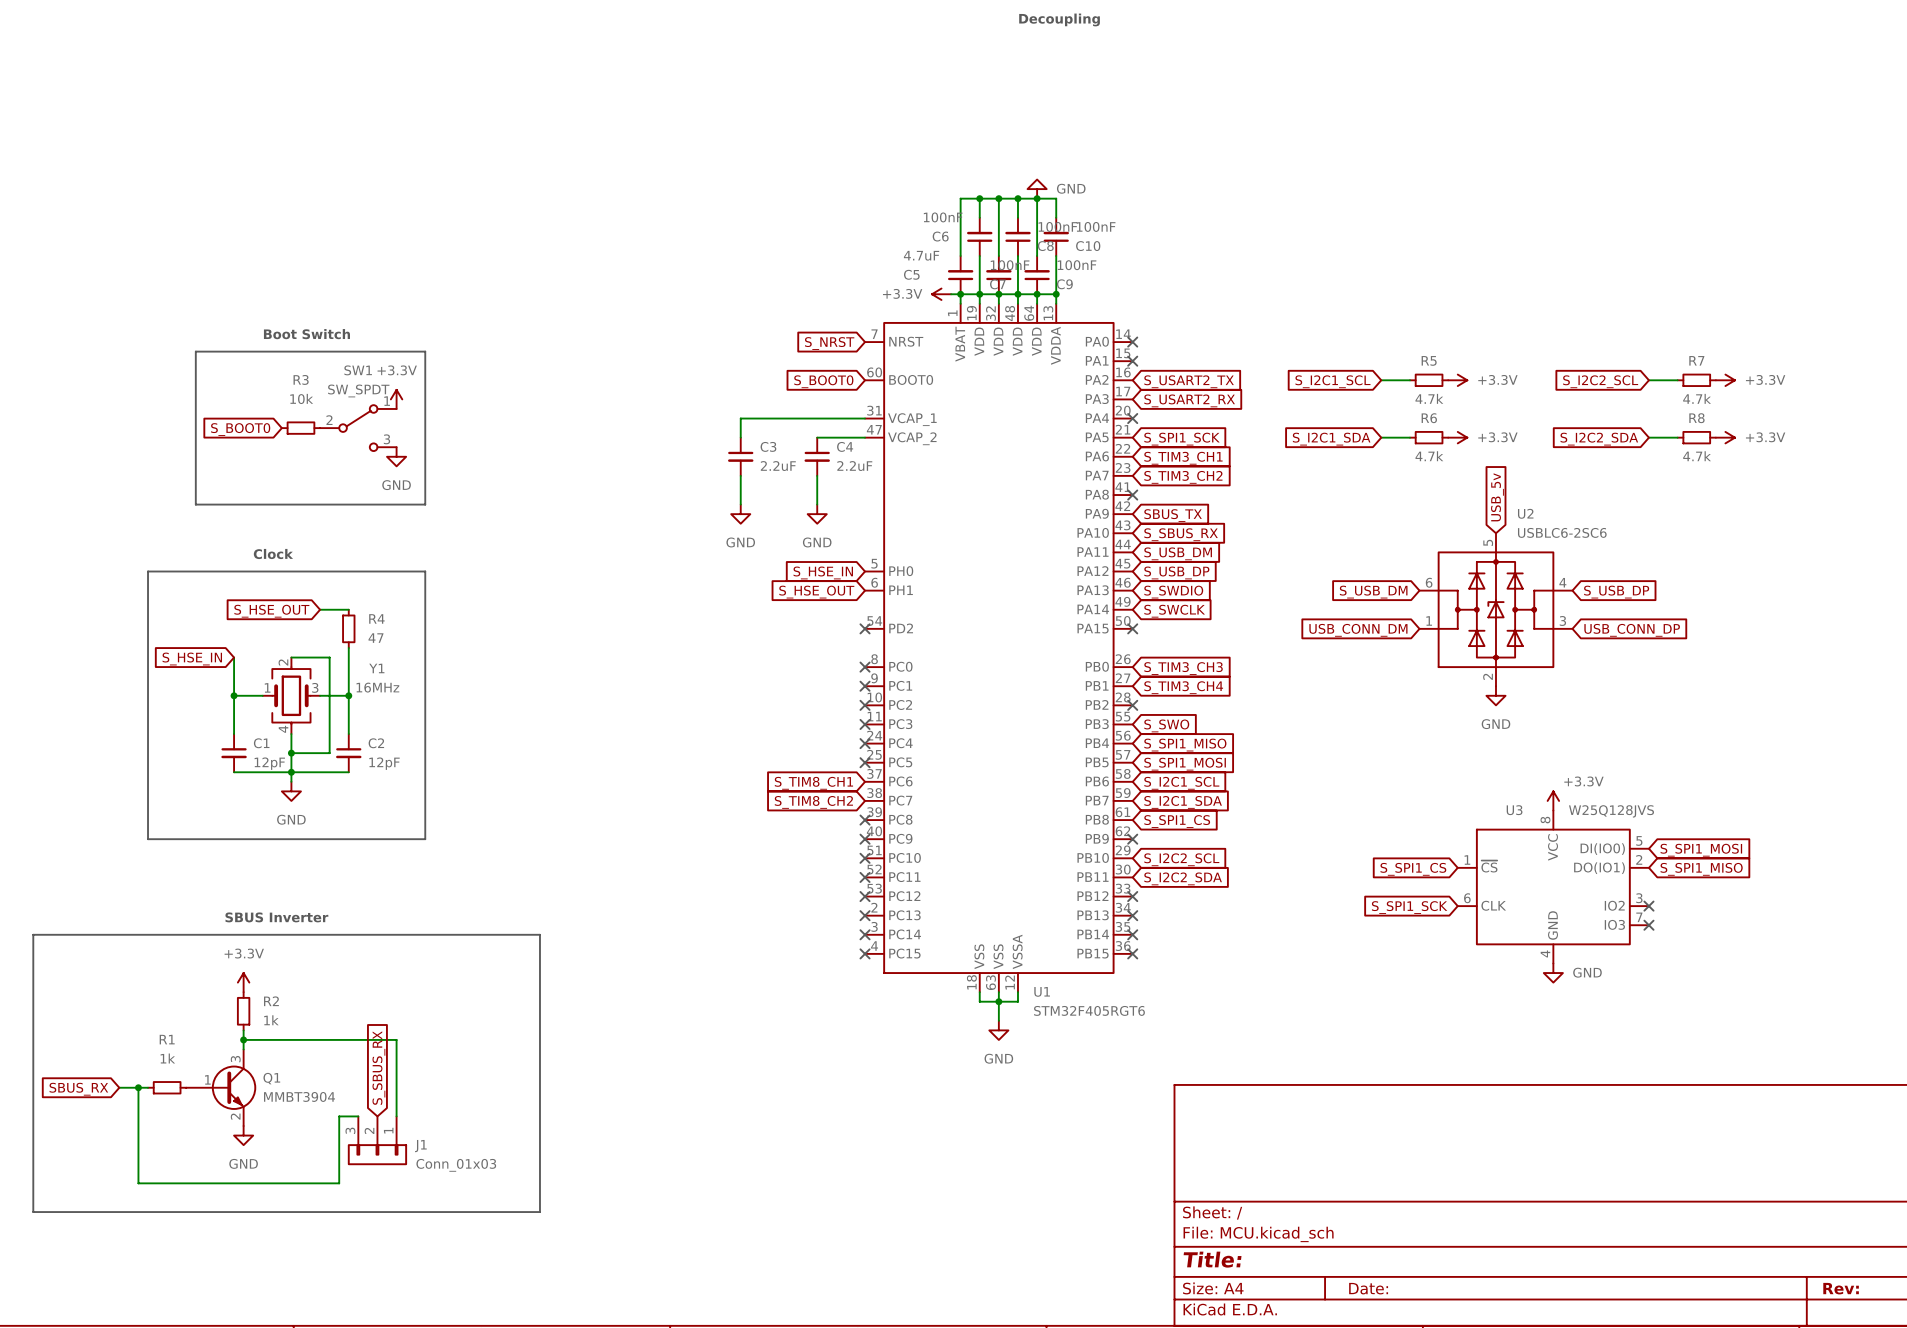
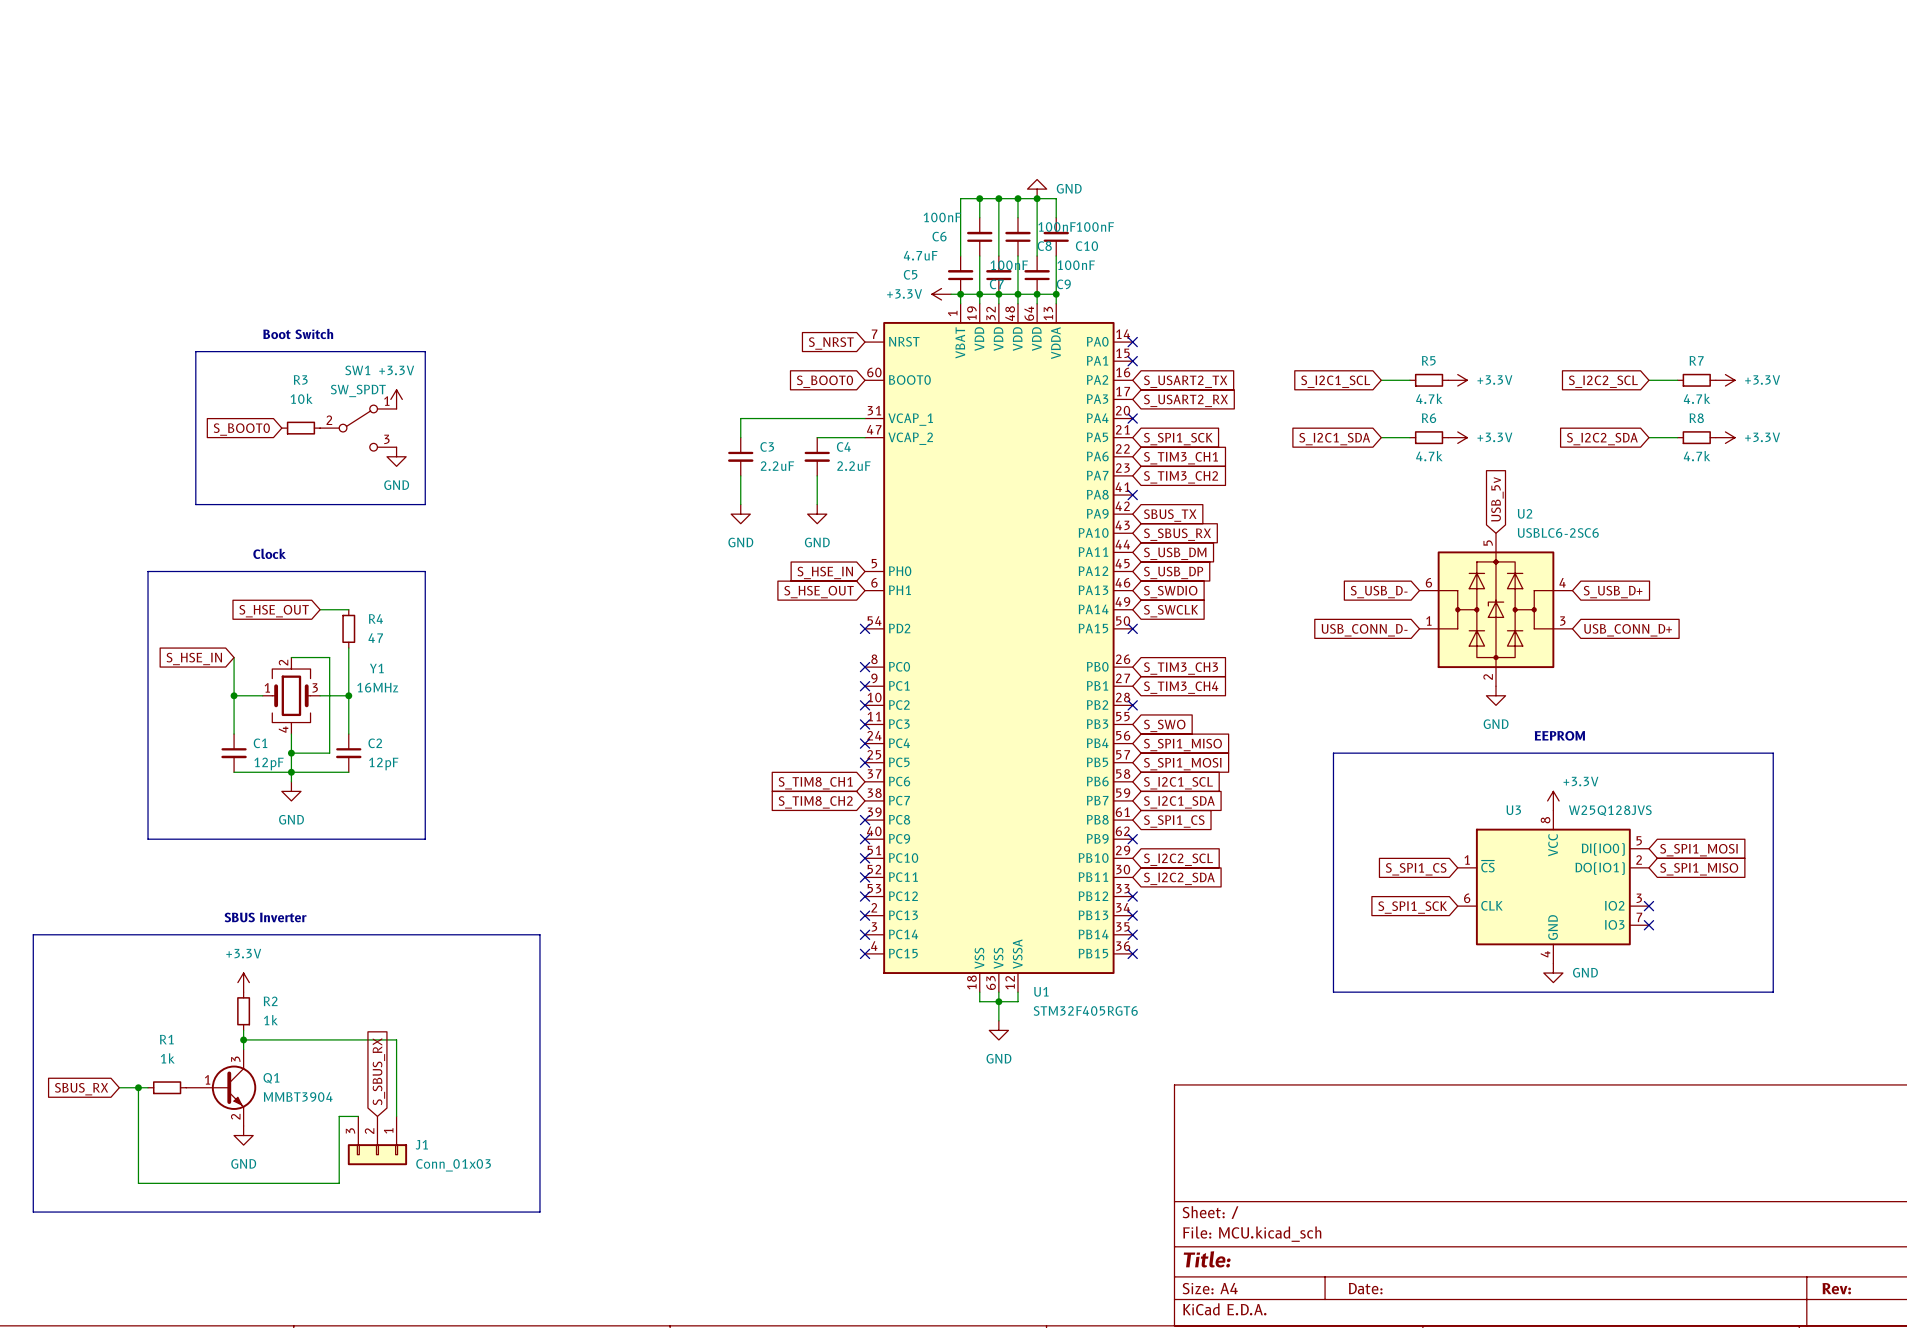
text: Decoupling (1059, 19) -> none
global label: S_USB_DM (1373, 592) -> S_USB_D- (1379, 592)
global label: S_USB_DP (1616, 592) -> S_USB_D+ (1613, 592)
global label: USB_CONN_DM (1358, 630) -> USB_CONN_D- (1364, 630)
global label: USB_CONN_DP (1632, 630) -> USB_CONN_D+ (1628, 630)
text: none -> EEPROM (1559, 735)
line: none -> (1333, 753) (1773, 753) (1773, 992) (1333, 992) (1333, 753)

